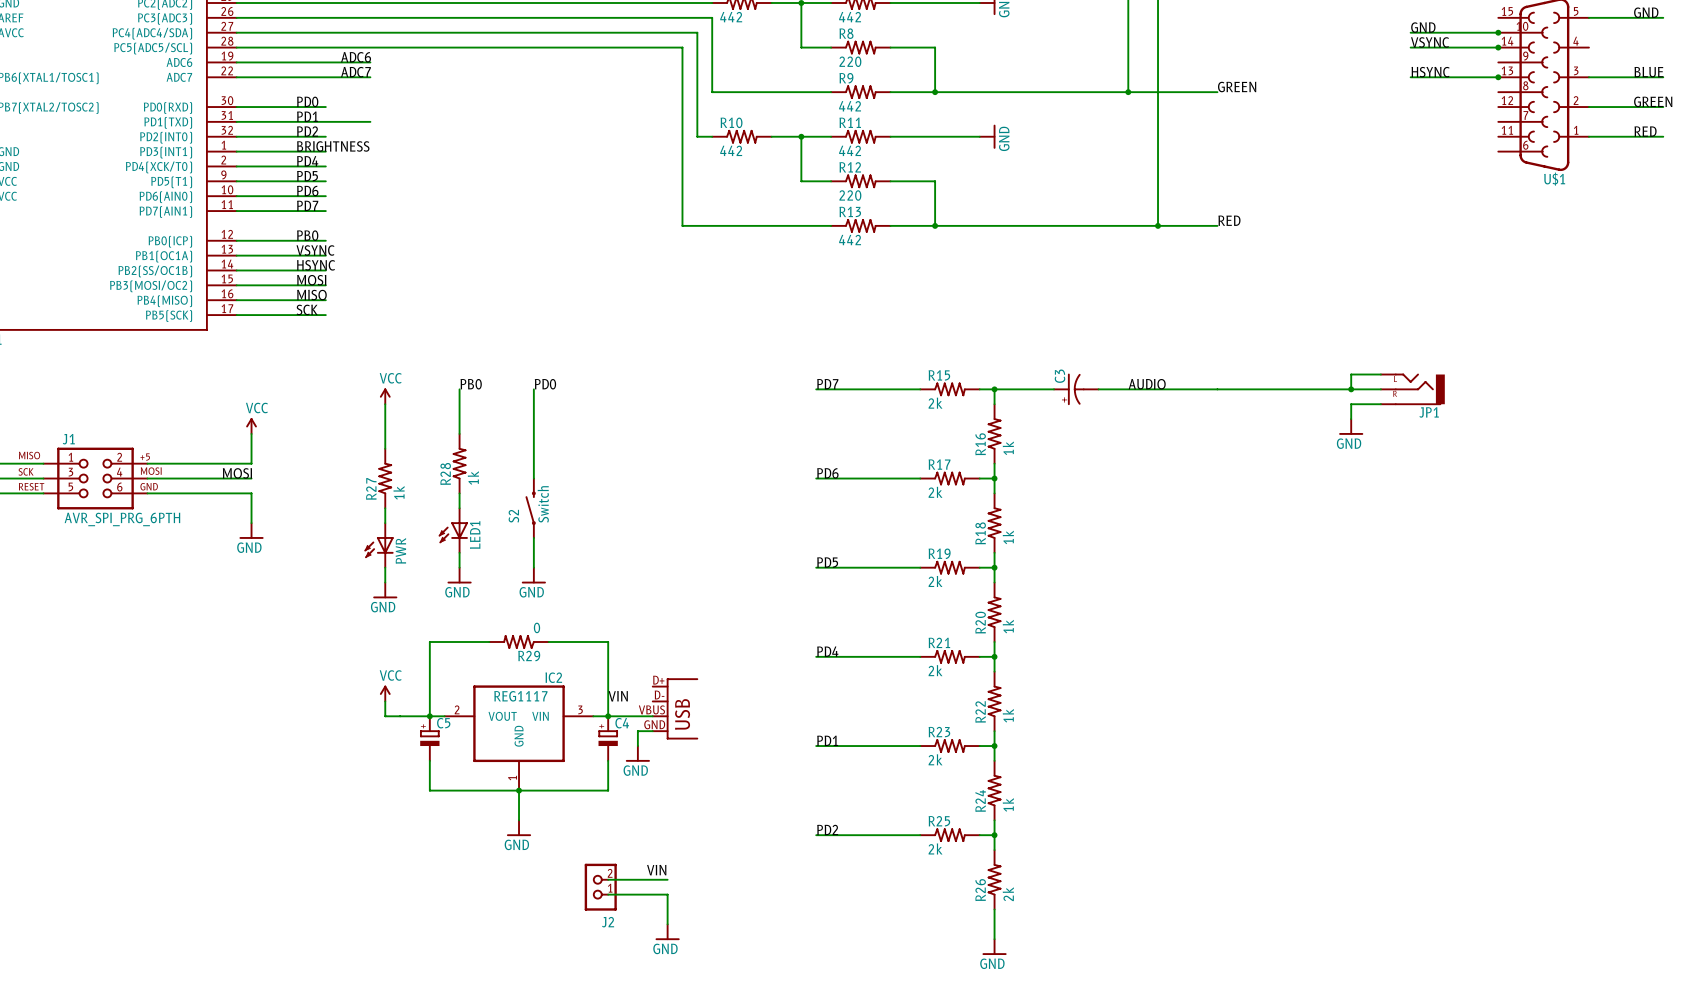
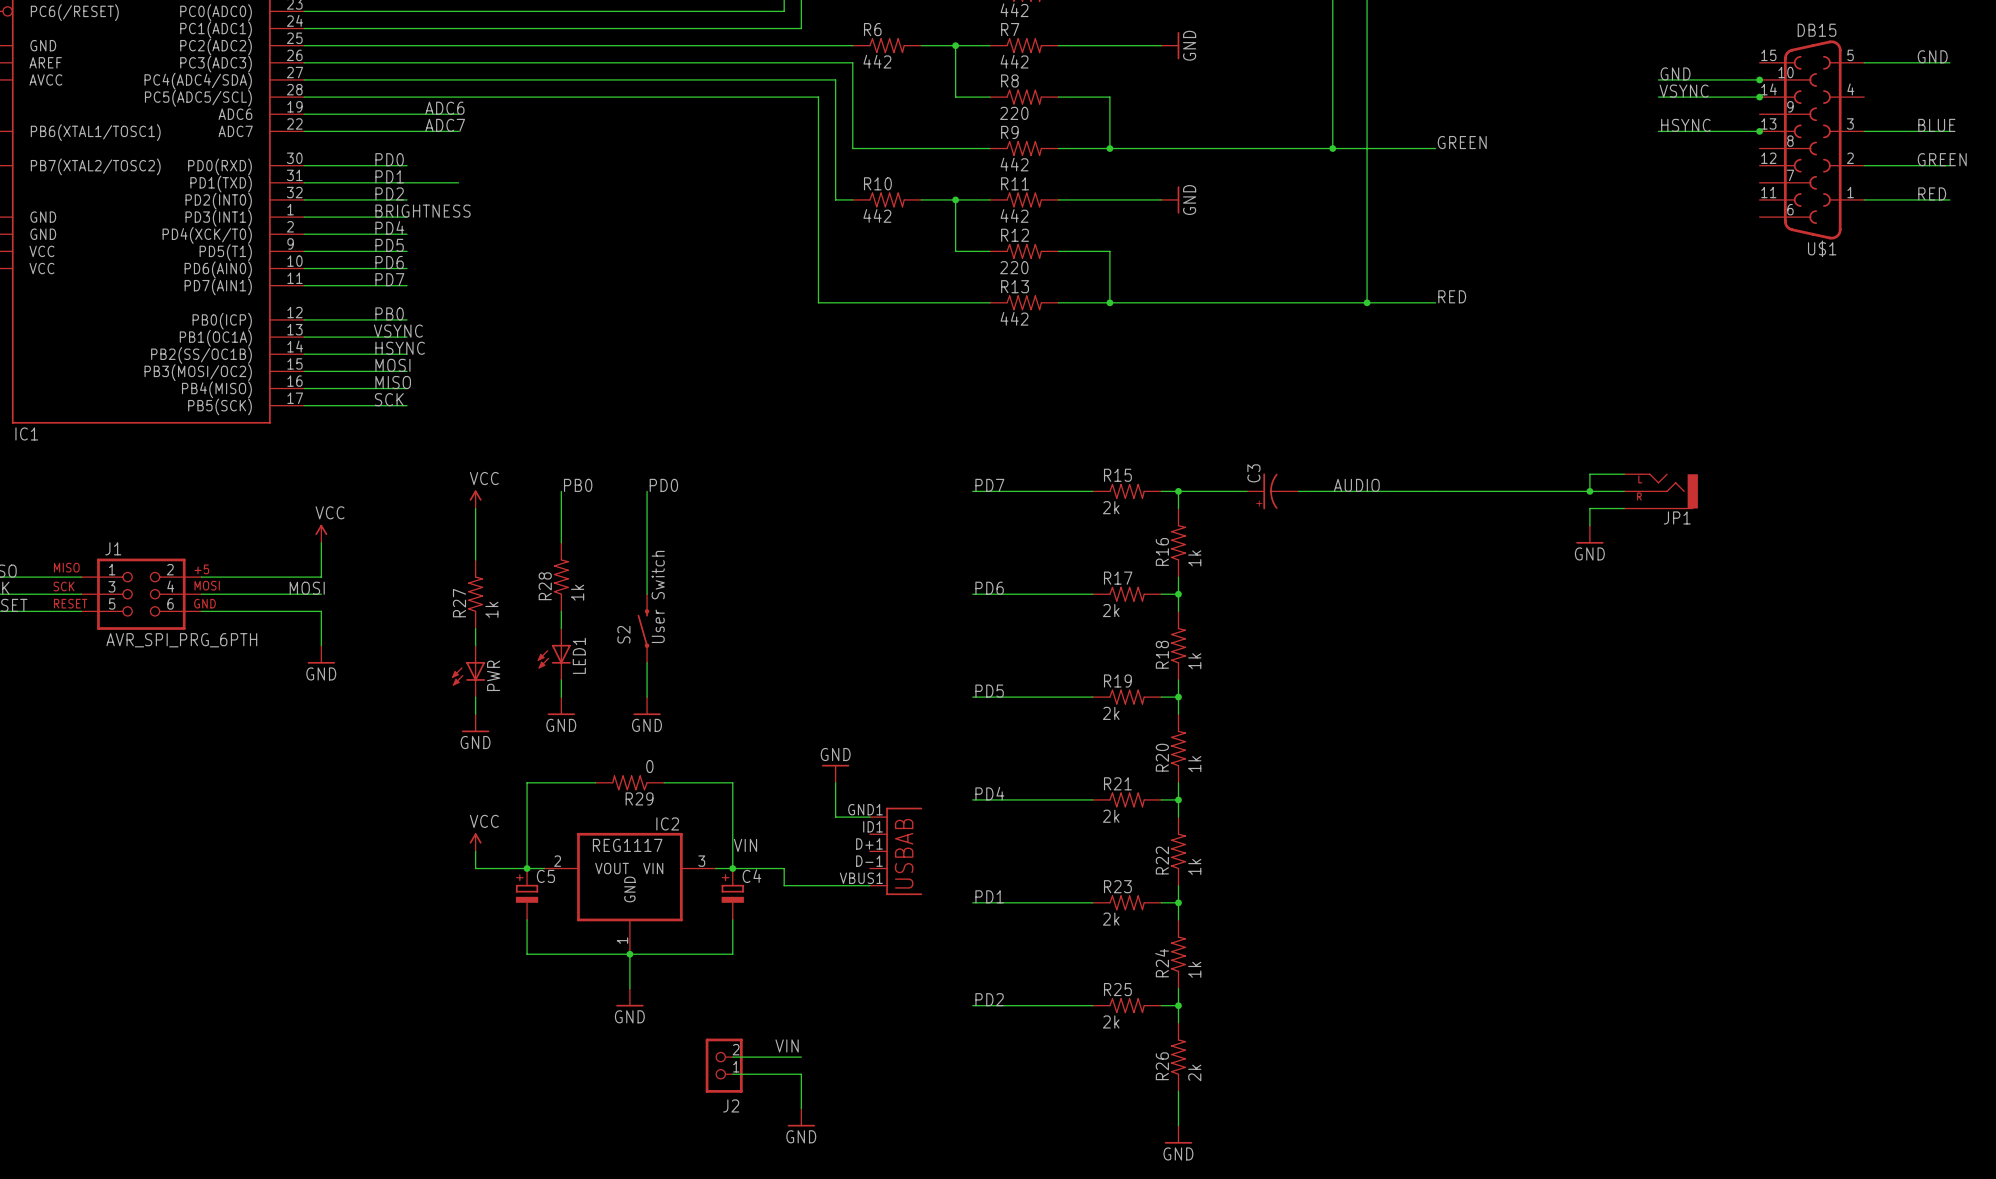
S2 value: Switch (543, 504) -> User Switch (658, 596)
wire: none -> (835, 782) (835, 817) (869, 817)
part: none -> (896, 851)
part: (675, 708) -> none
wire: none -> (784, 868) (784, 885) (869, 885)
wire: (652, 731) (637, 731) (637, 746) -> none
power symbol position: GND (637, 753) -> GND (835, 773)
power symbol rotation: 0° (637, 760) -> 180° (835, 765)

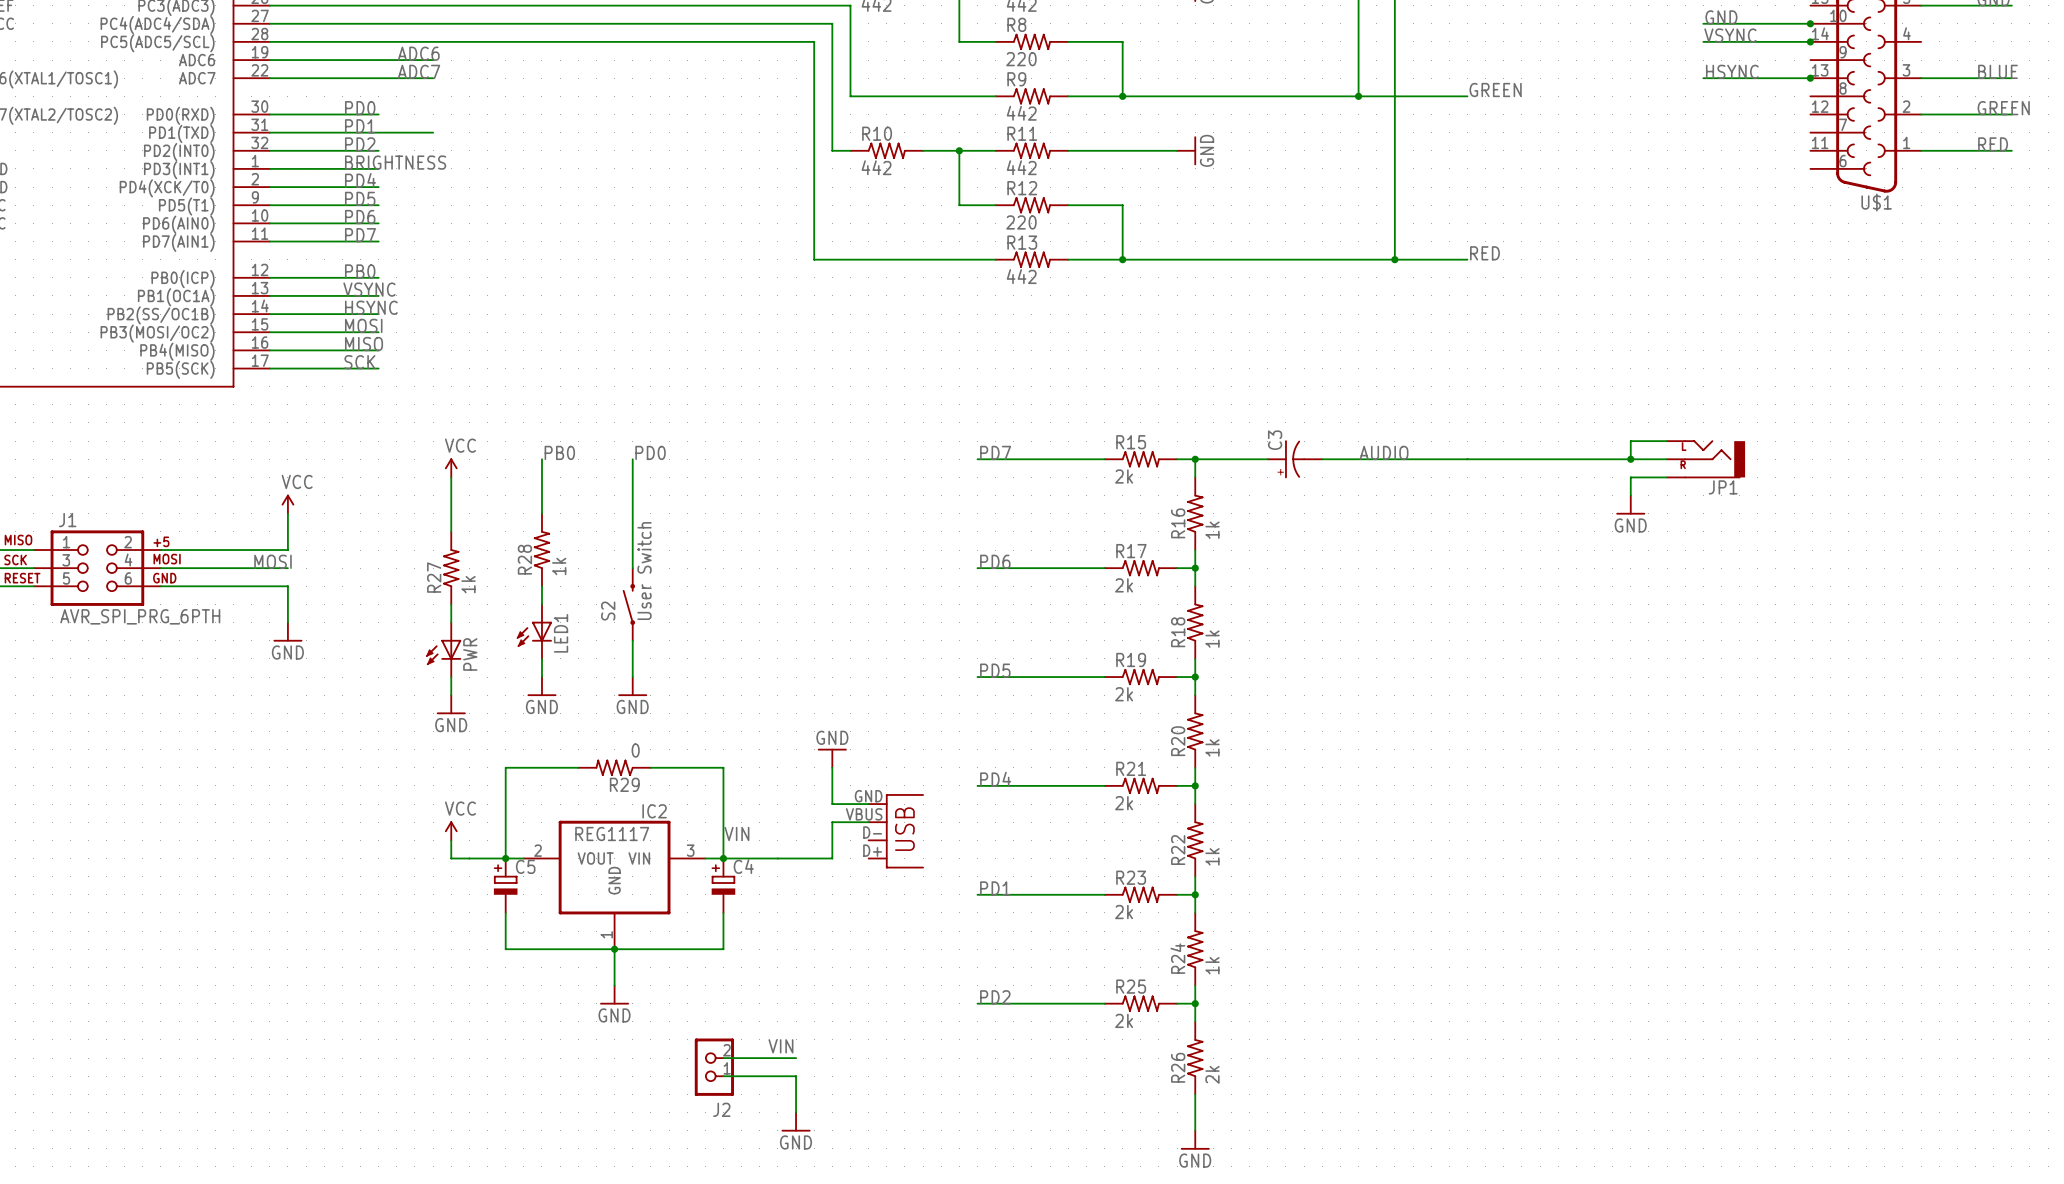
part: none -> (896, 831)
part: (896, 851) -> none
wire: (784, 868) (784, 885) (869, 885) -> (777, 858) (832, 858) (832, 822) (868, 822)

